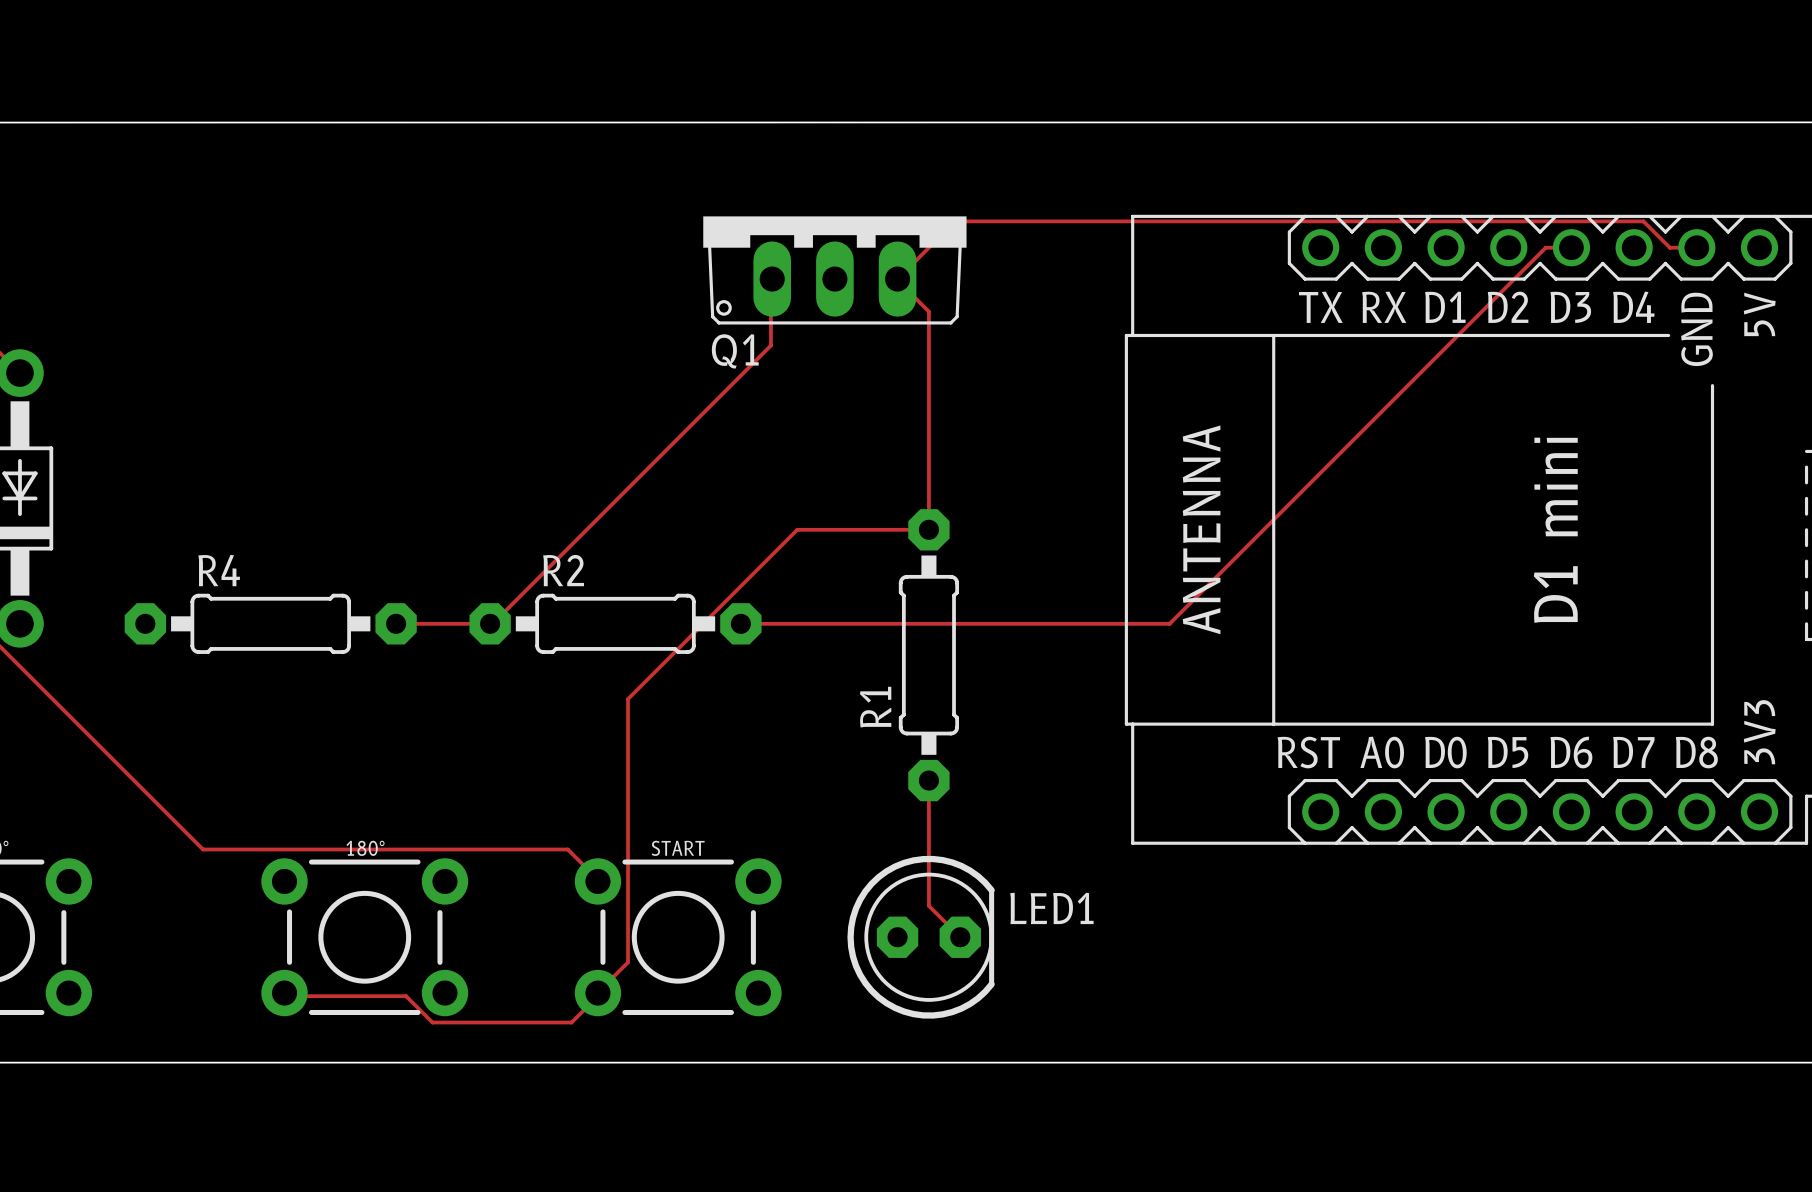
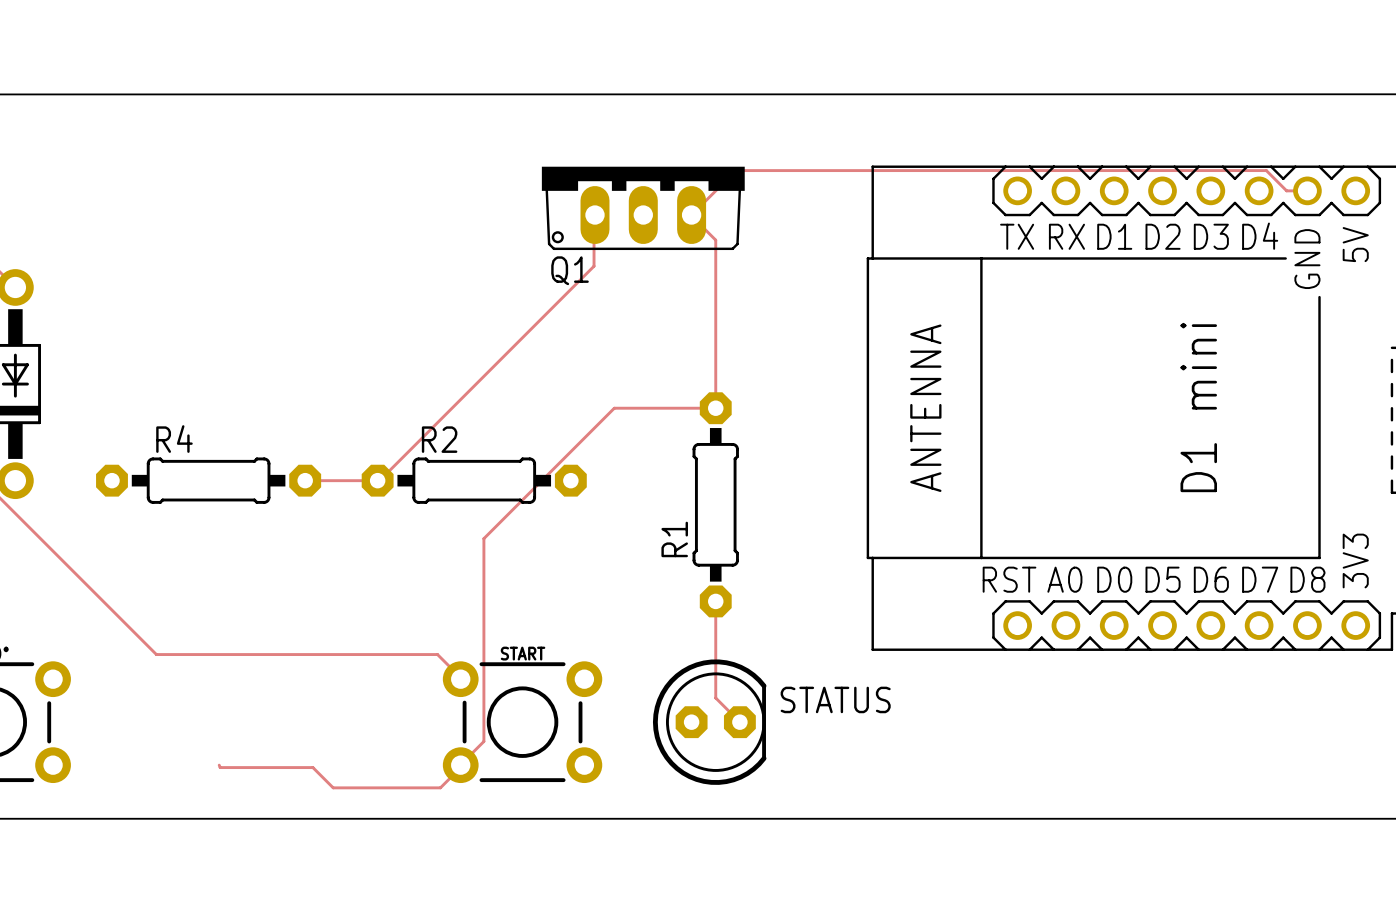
track: (1571, 247) (1545, 247) (1169, 623) (740, 623) -> none
LED1 name: LED1 (1051, 908) -> STATUS (835, 699)
180°: (364, 937) -> none

